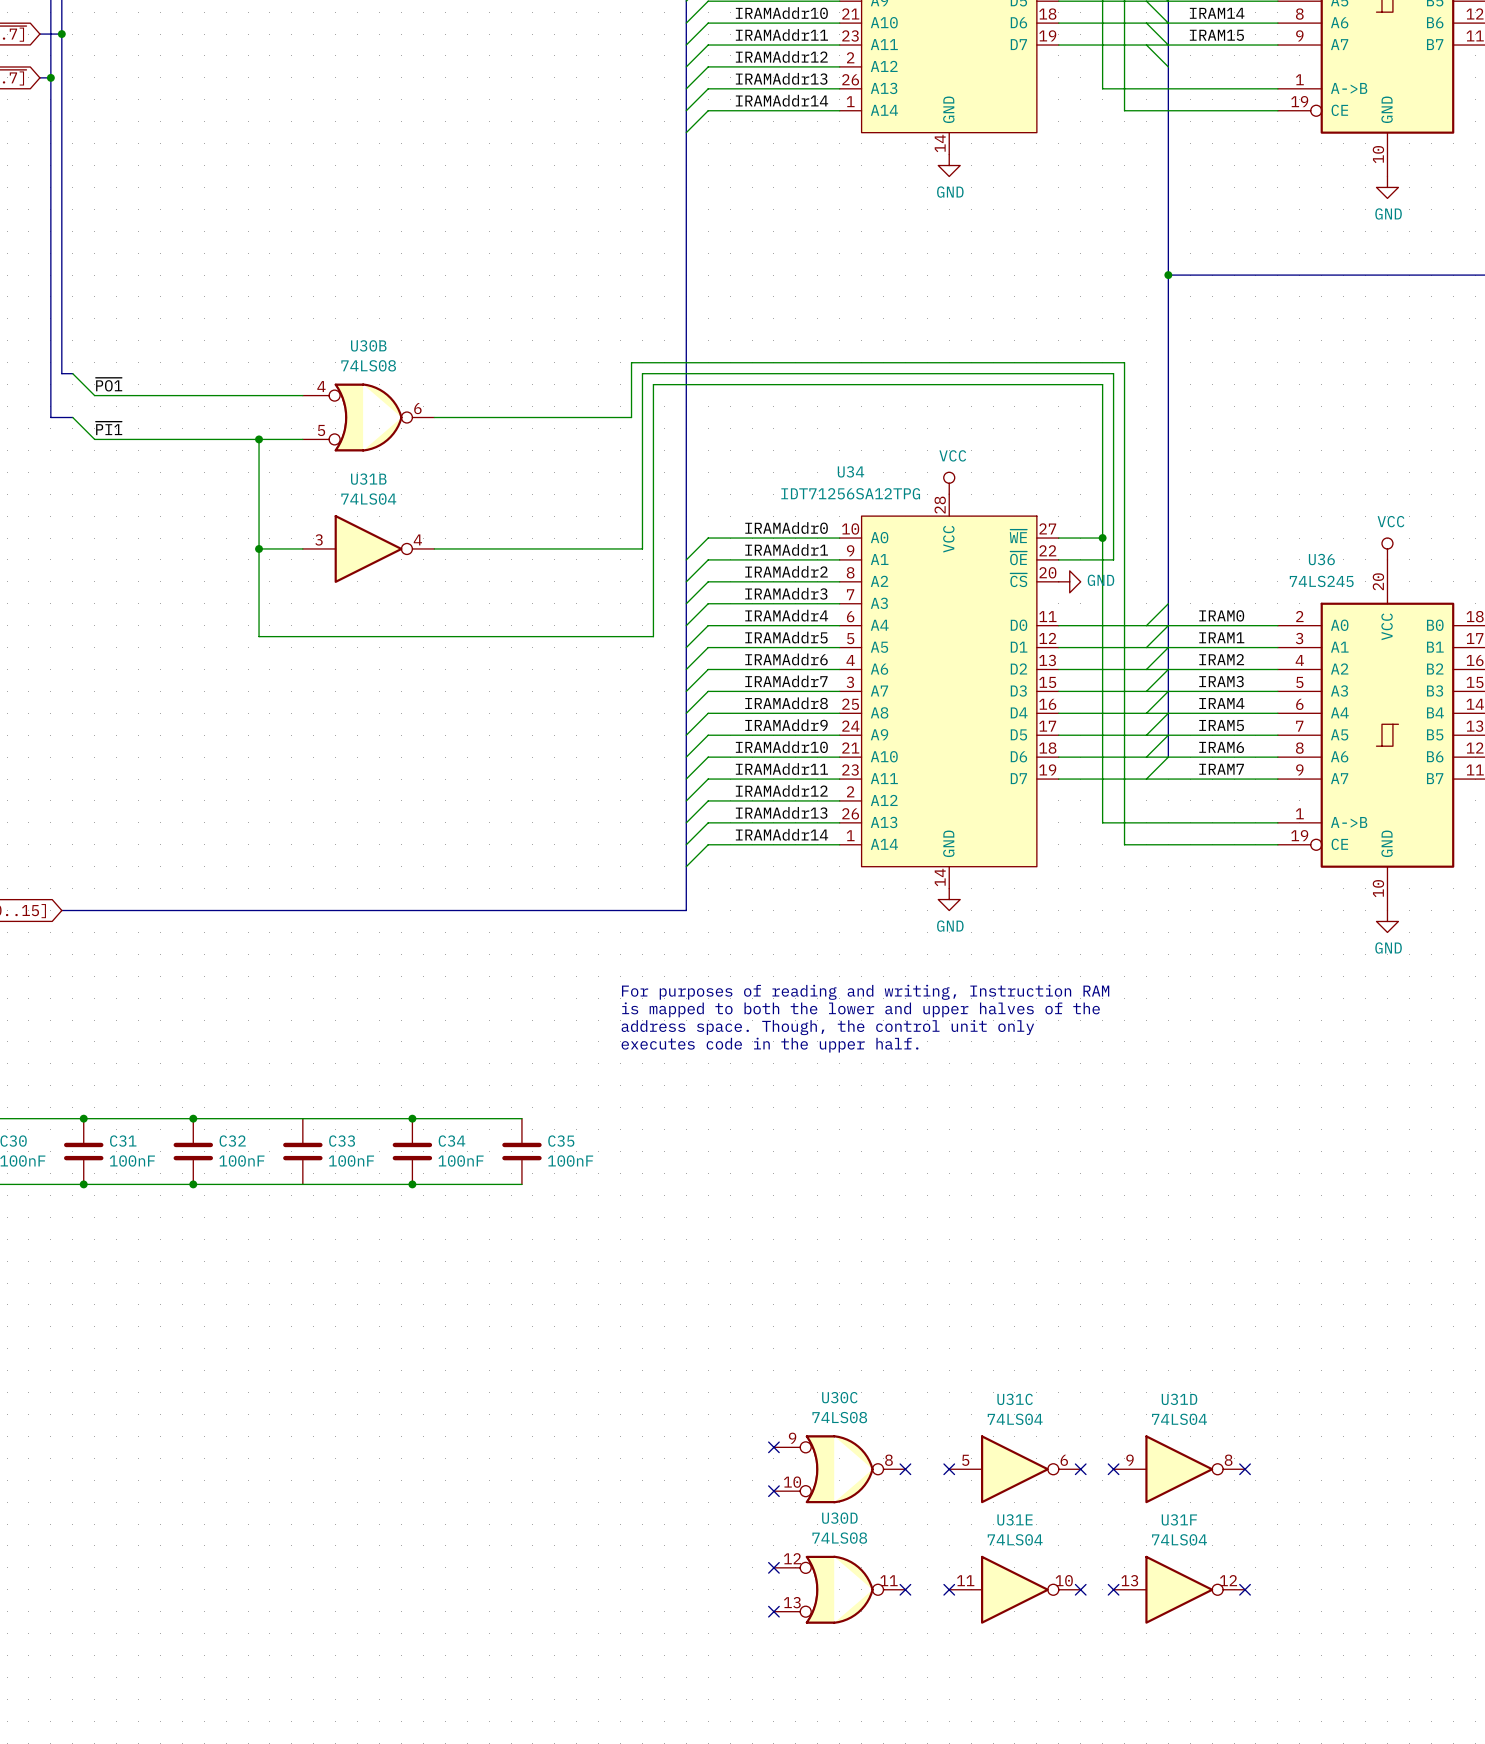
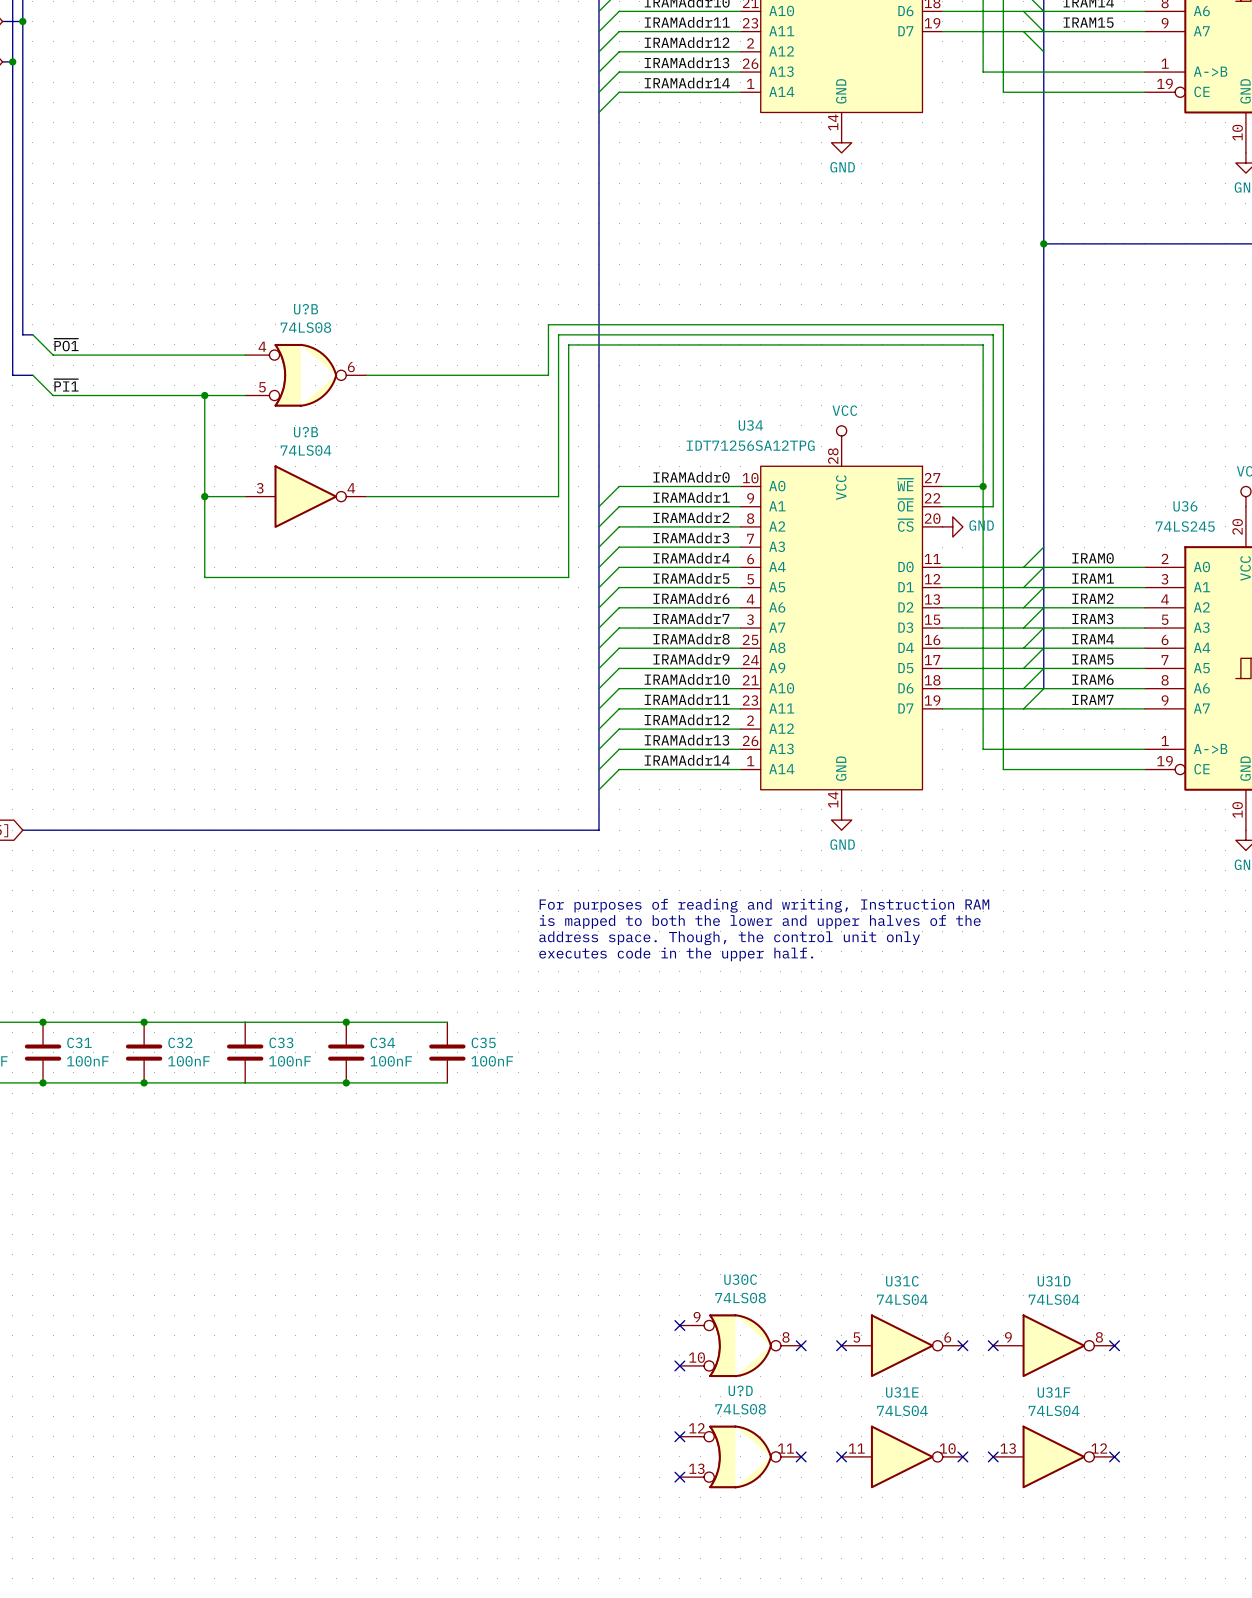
U30B name: U30B (368, 345) -> U?B (306, 309)
U31B name: U31B (368, 479) -> U?B (306, 432)
U30D name: U30D (839, 1518) -> U?D (740, 1390)

